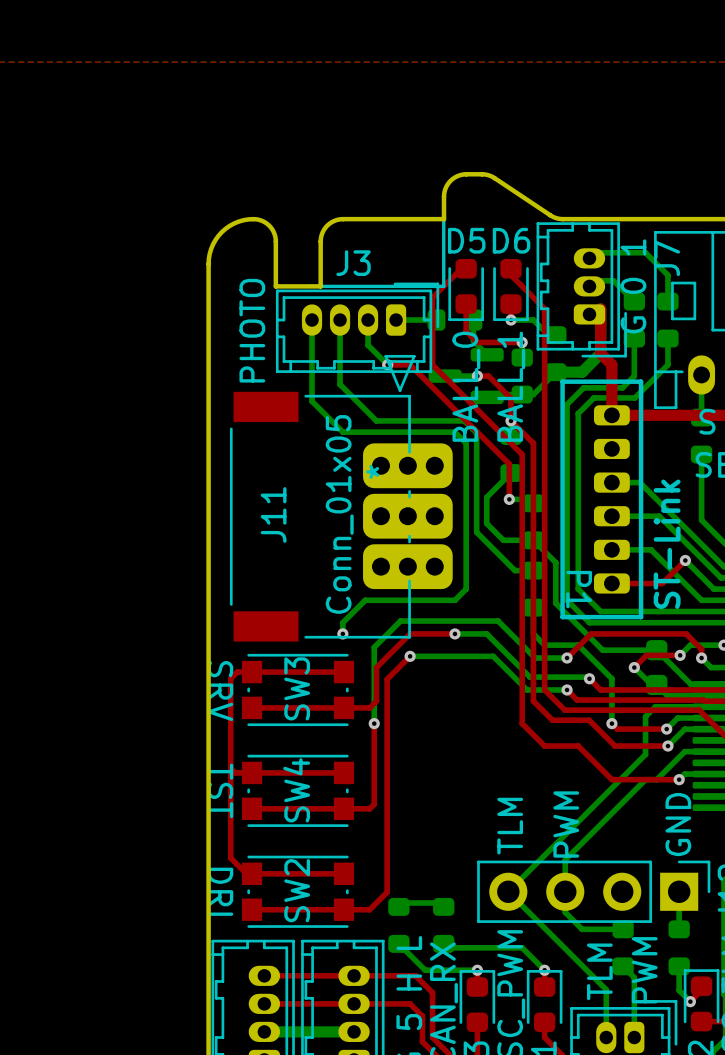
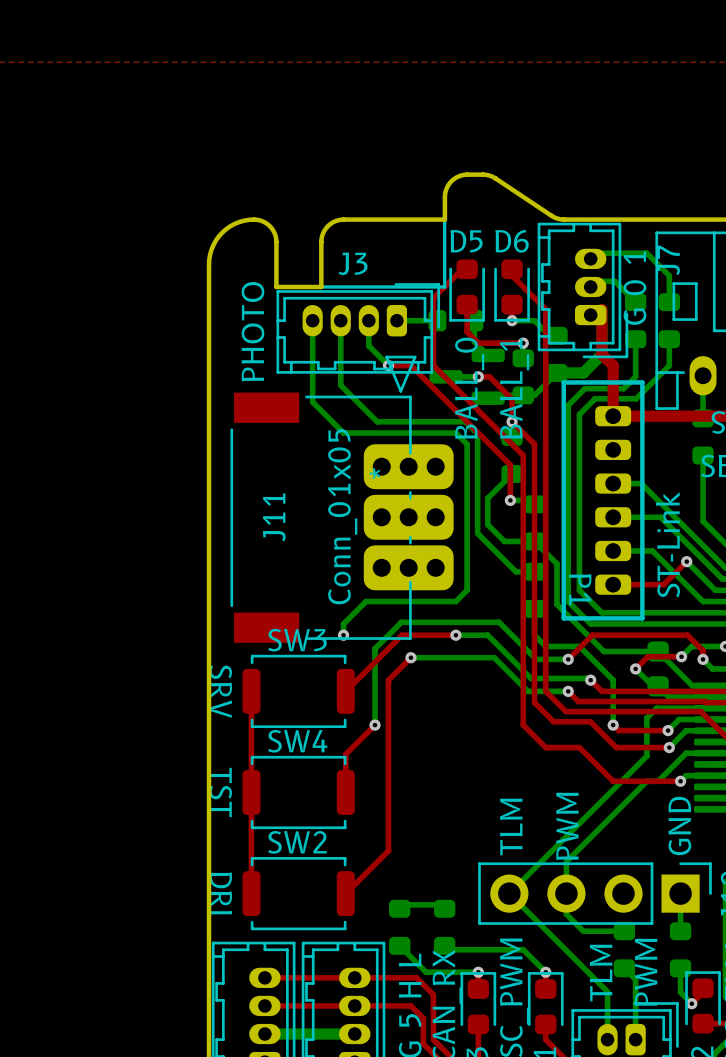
top track: (410, 633) (376, 667) (376, 701) (369, 707) (252, 707) -> (410, 635) (401, 635) (345, 691)
SW3 footprint: [241, 653, 355, 727] -> [242, 654, 355, 729]
top track: (343, 672) (237, 672) (230, 678) (230, 858) (246, 873) (343, 873) -> none
top track: (387, 678) (387, 892) (369, 909) (252, 909) -> (388, 680) (388, 850) (345, 893)
SW3 name position: SW3 (297, 688) -> SW3 (297, 640)
top track: none -> (251, 691) (251, 893)
top track: (374, 723) (374, 804) (369, 808) (252, 808) -> (375, 725) (345, 754) (345, 792)
SW4 footprint: [241, 754, 355, 827] -> [242, 755, 355, 830]
top track: (230, 768) (235, 772) (343, 772) -> none
SW4 name position: SW4 (296, 790) -> SW4 (297, 741)
SW2 footprint: [241, 855, 355, 928] -> [242, 856, 355, 931]
SW2 name position: SW2 (297, 890) -> SW2 (297, 842)

